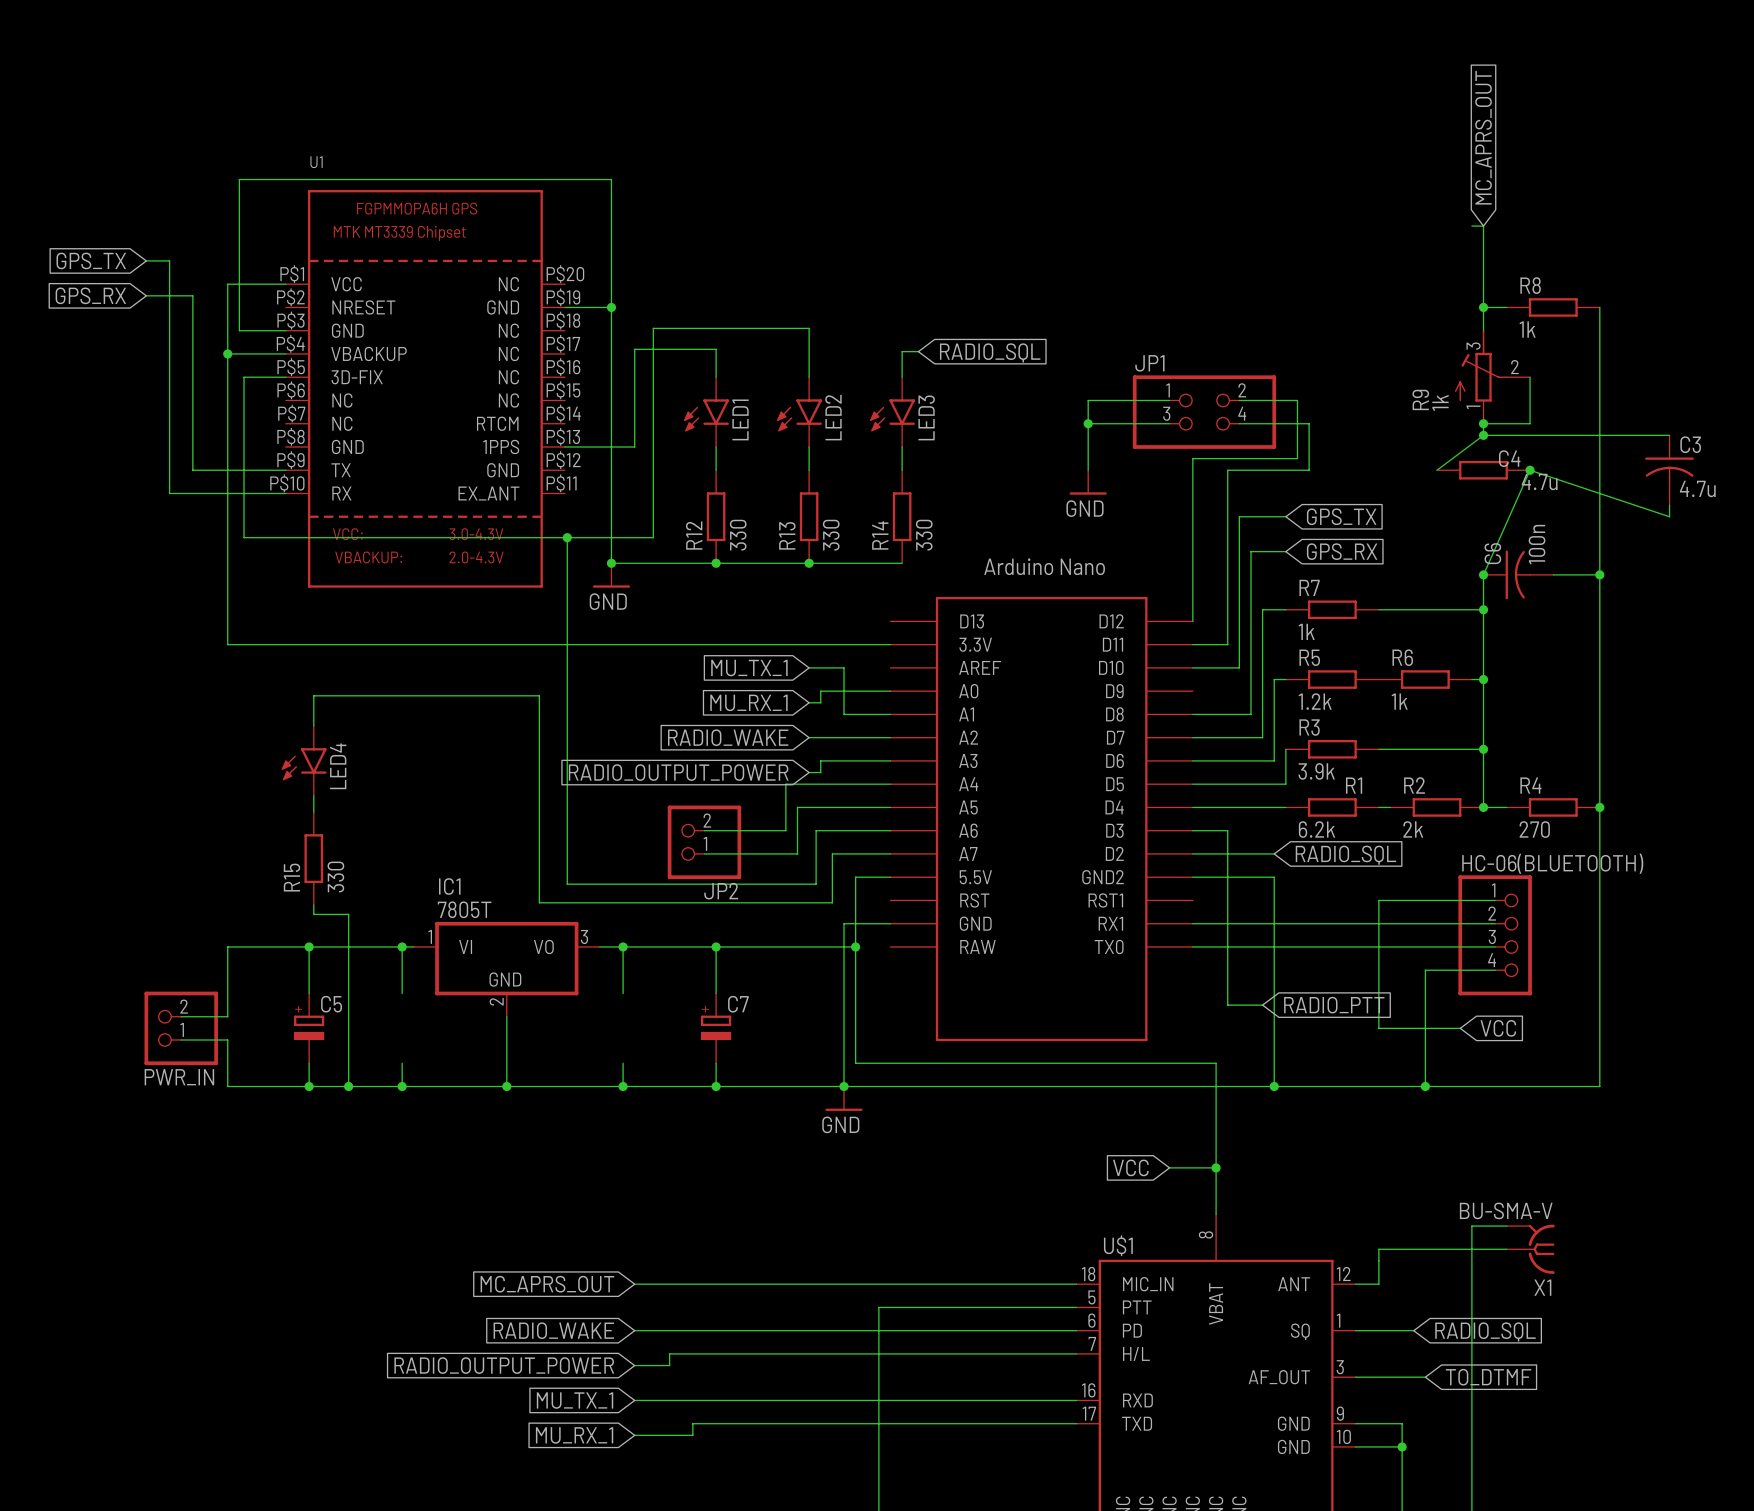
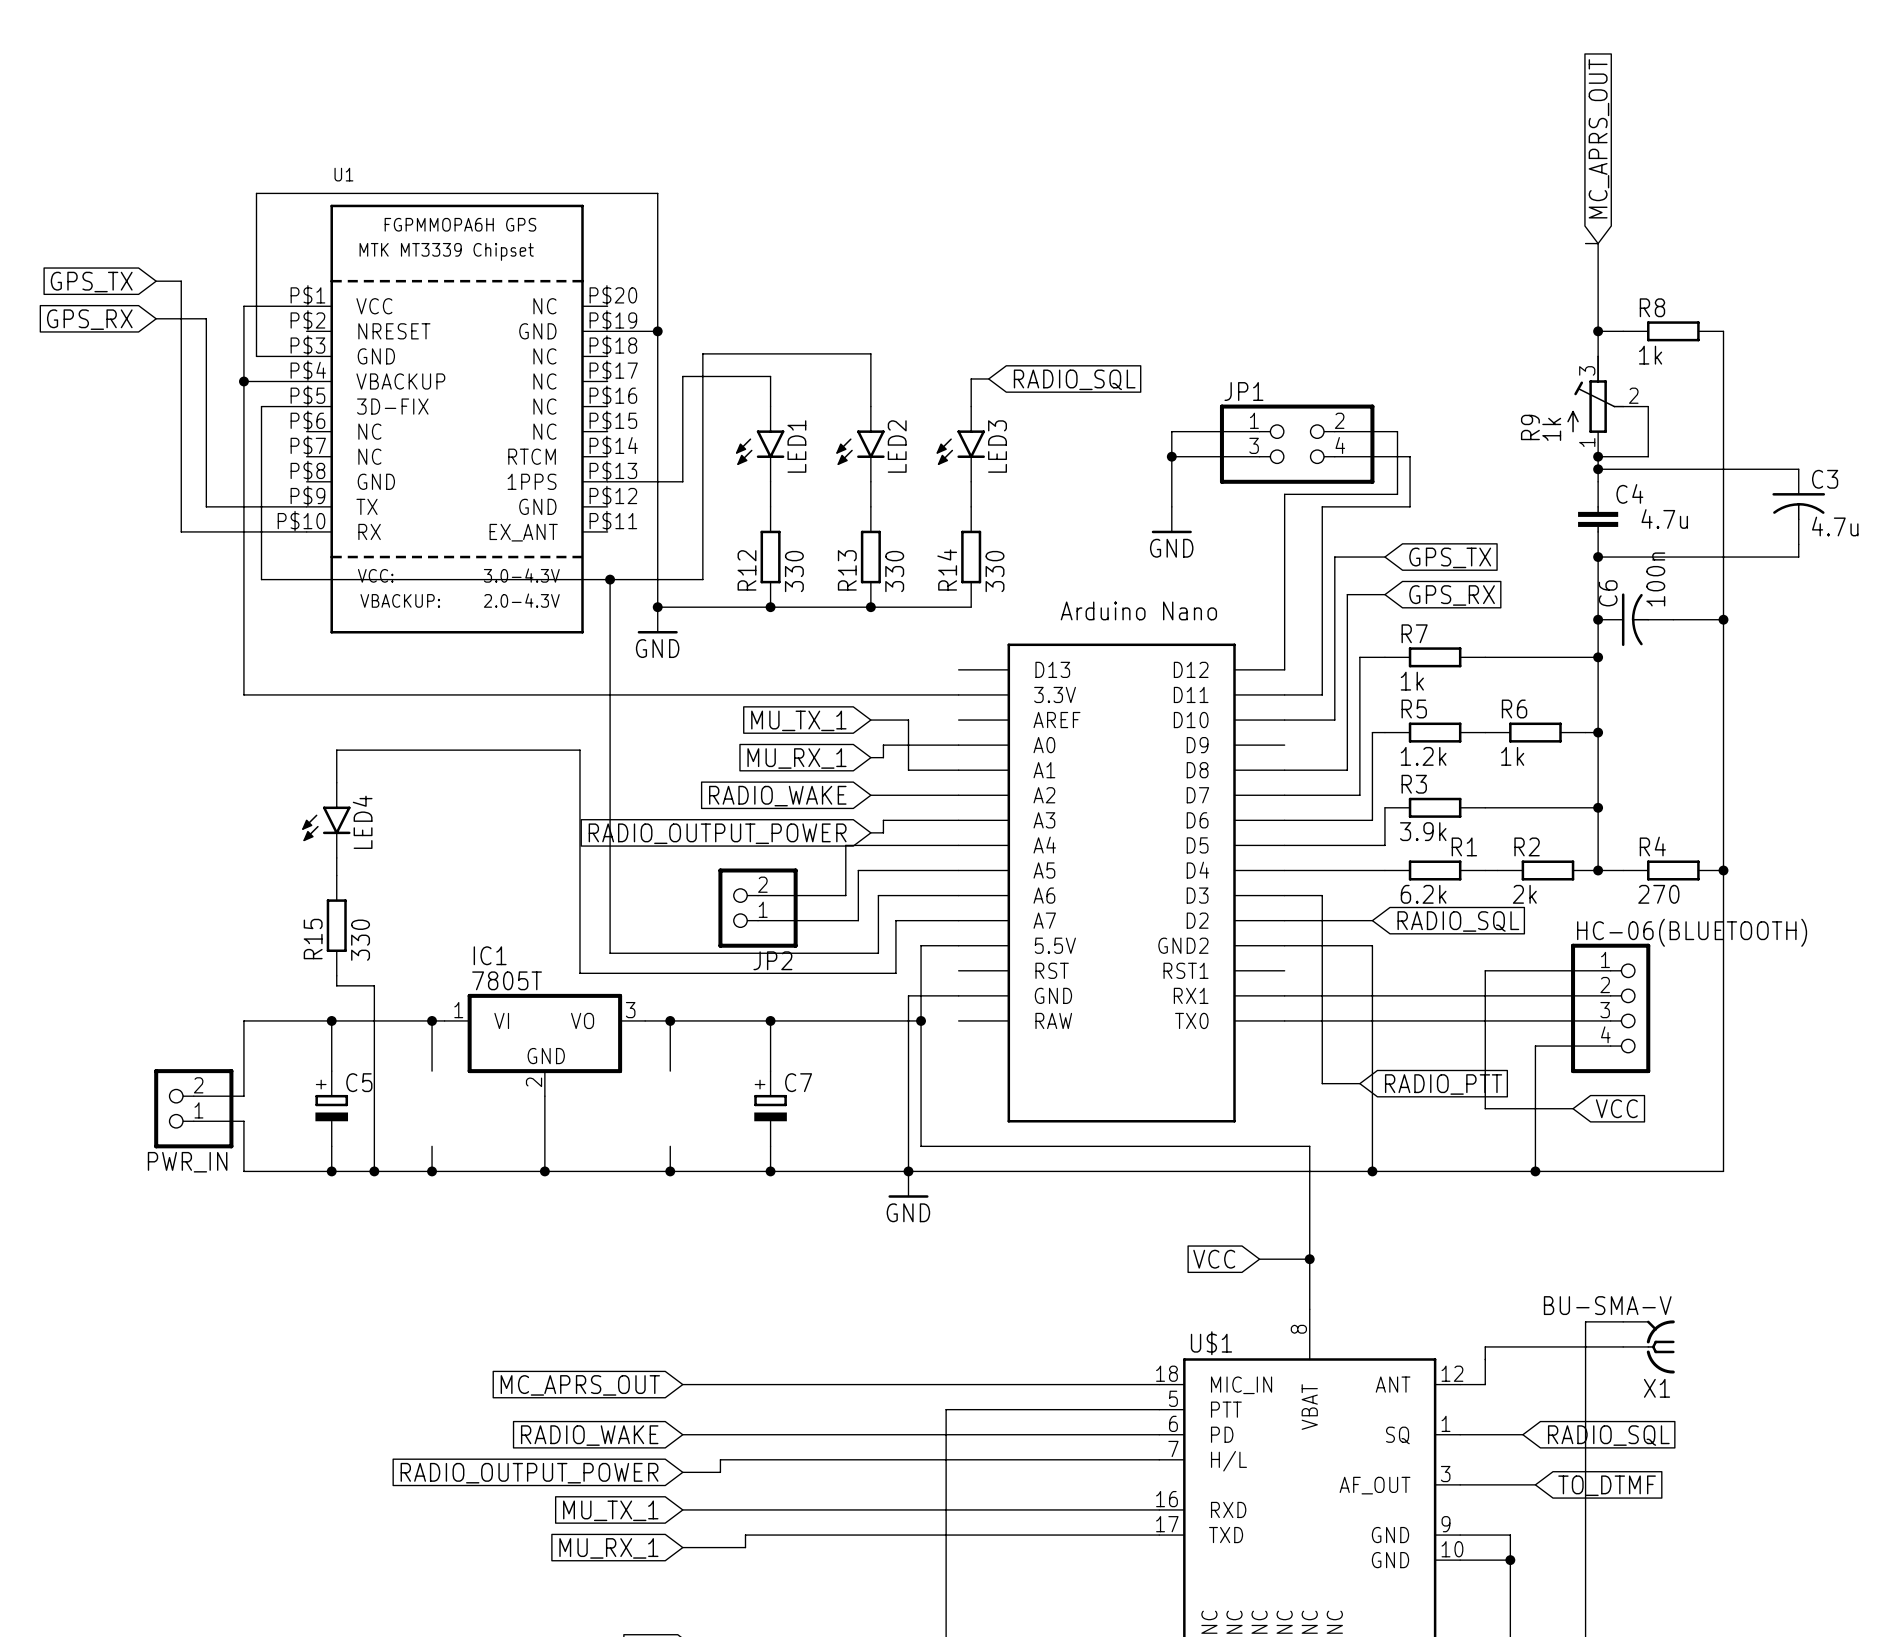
wire: (1483, 435) (1437, 470) -> (1598, 469) (1598, 481)
C4 symbol: [1437, 460, 1531, 480] -> [1578, 481, 1619, 558]
junction: (1530, 470) -> none
junction: none -> (1598, 557)
wire: (1669, 516) (1530, 470) (1483, 574) -> (1798, 557) (1598, 557) (1598, 619)

